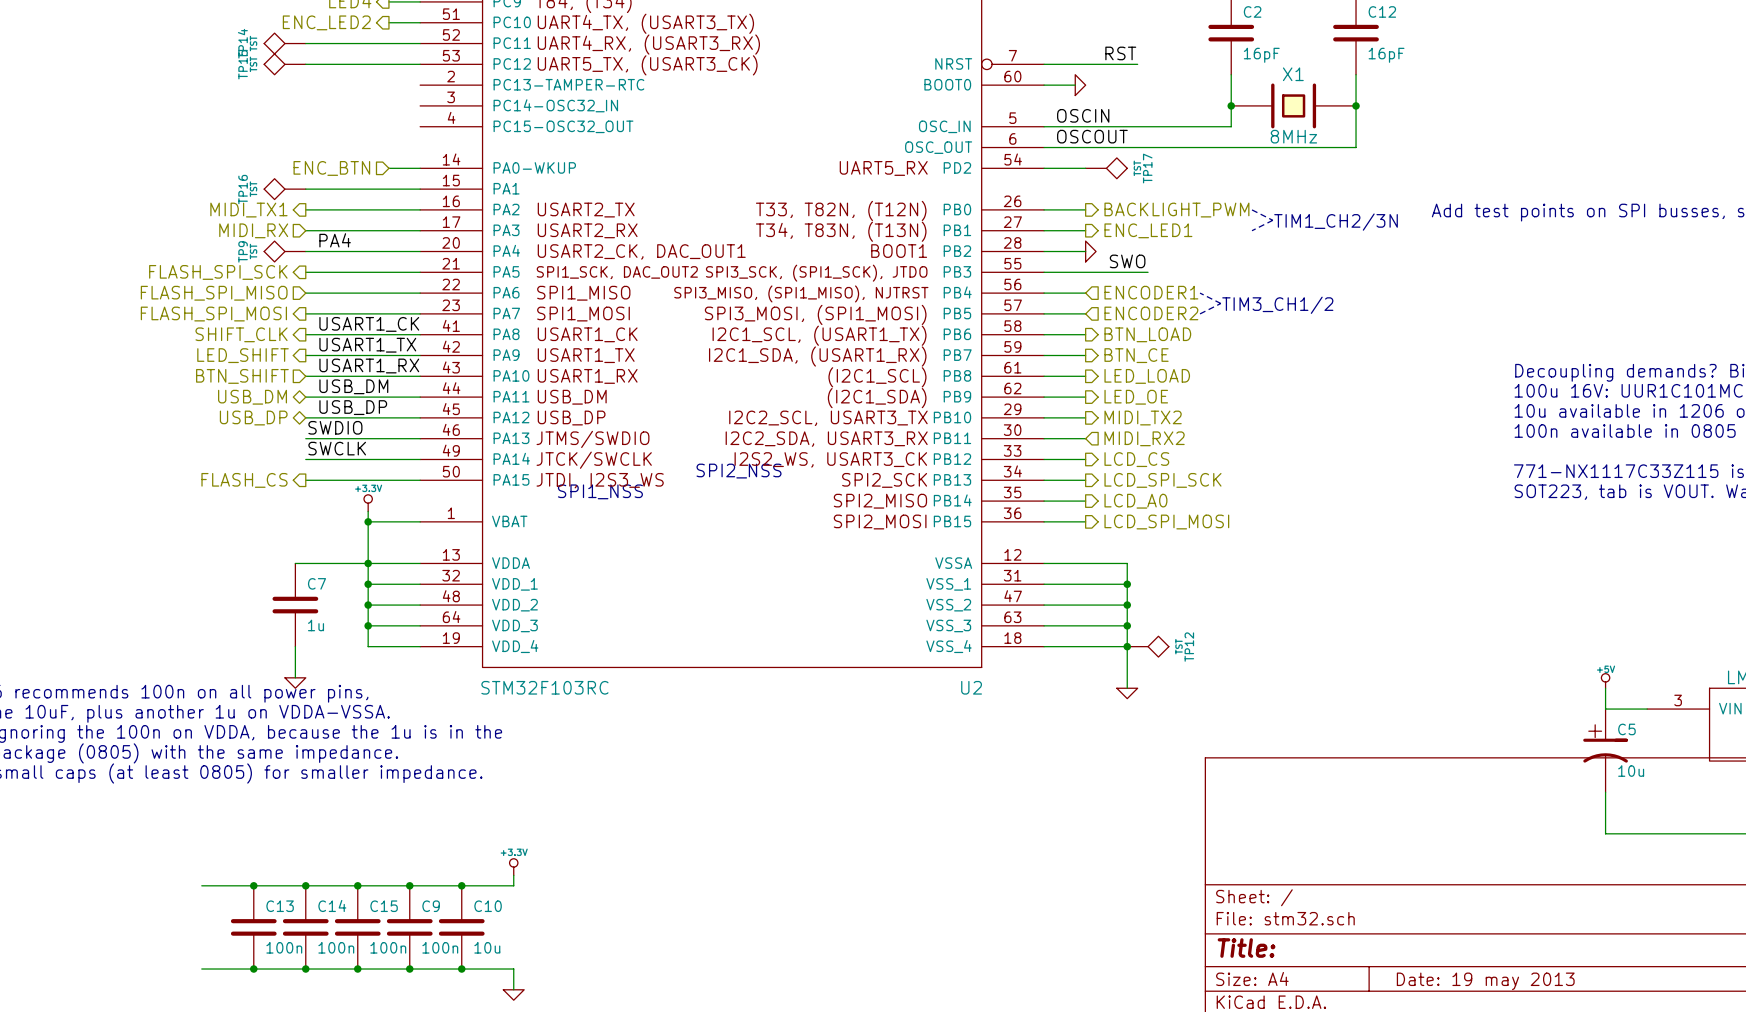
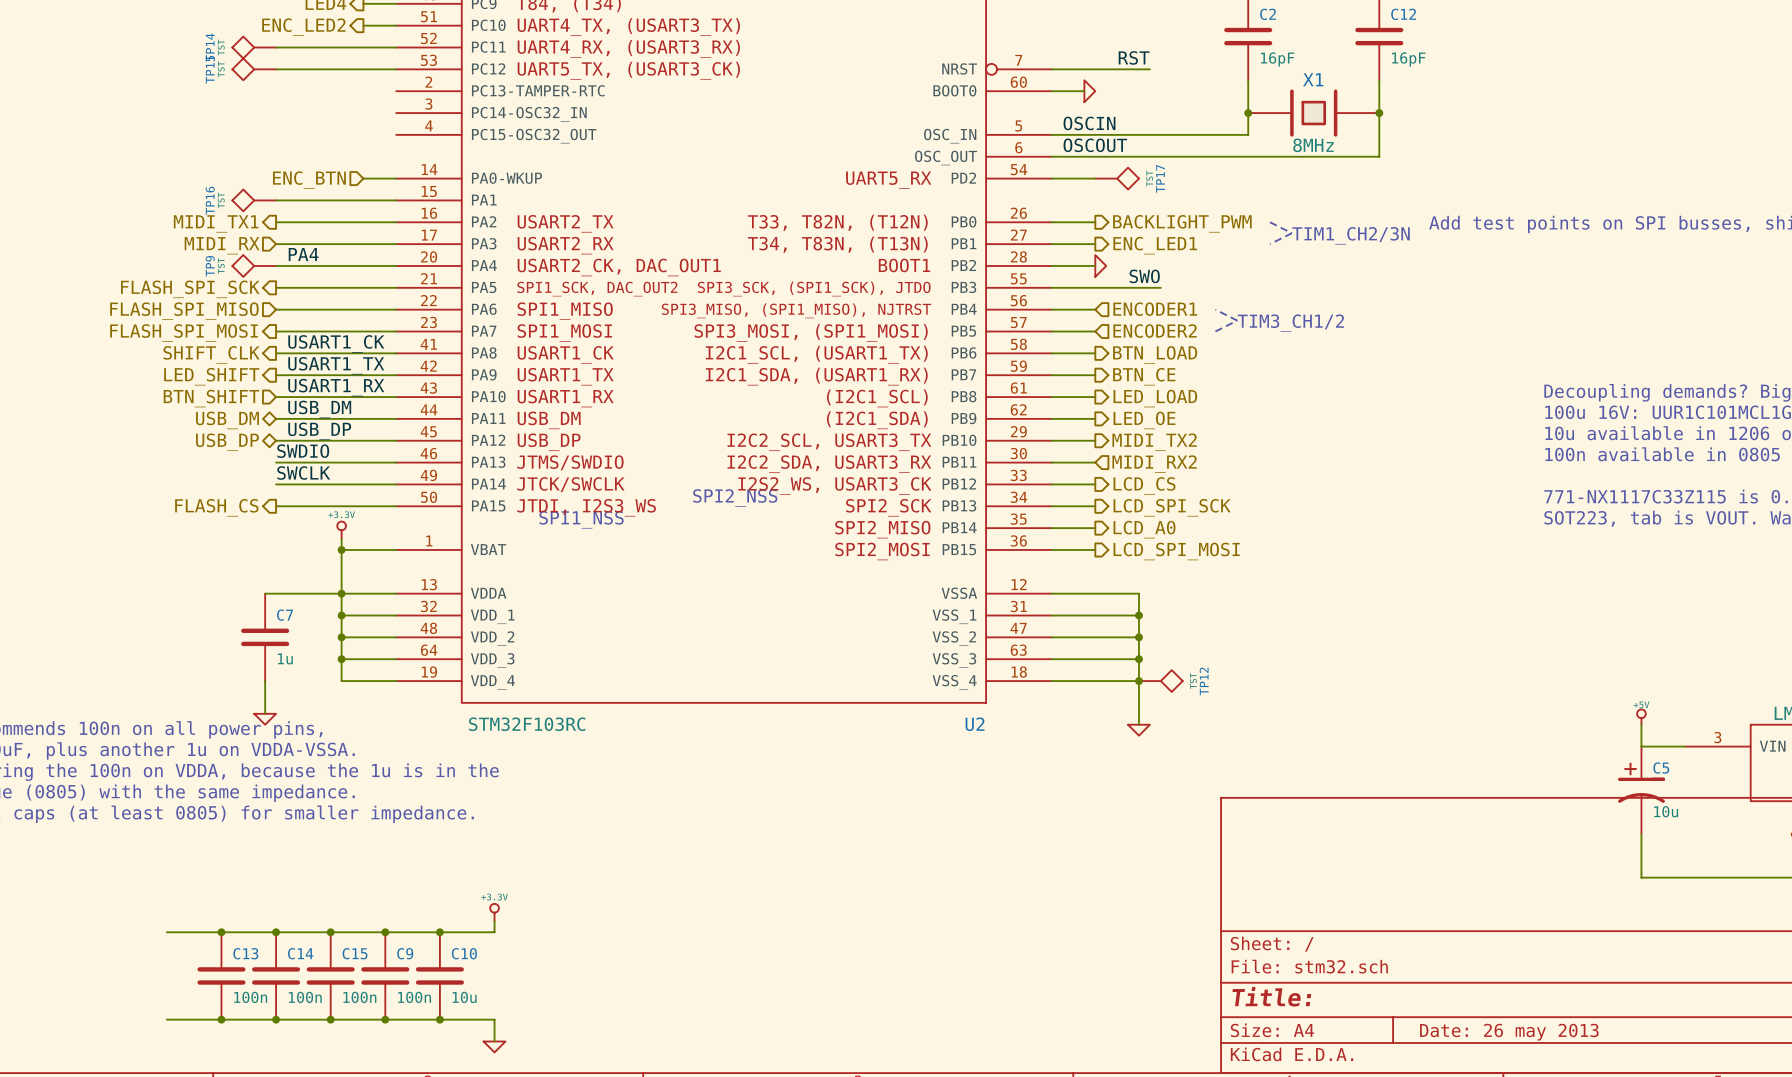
title block: Date: 19 may 2013 (1485, 981) -> Date: 26 may 2013 (1509, 1032)

